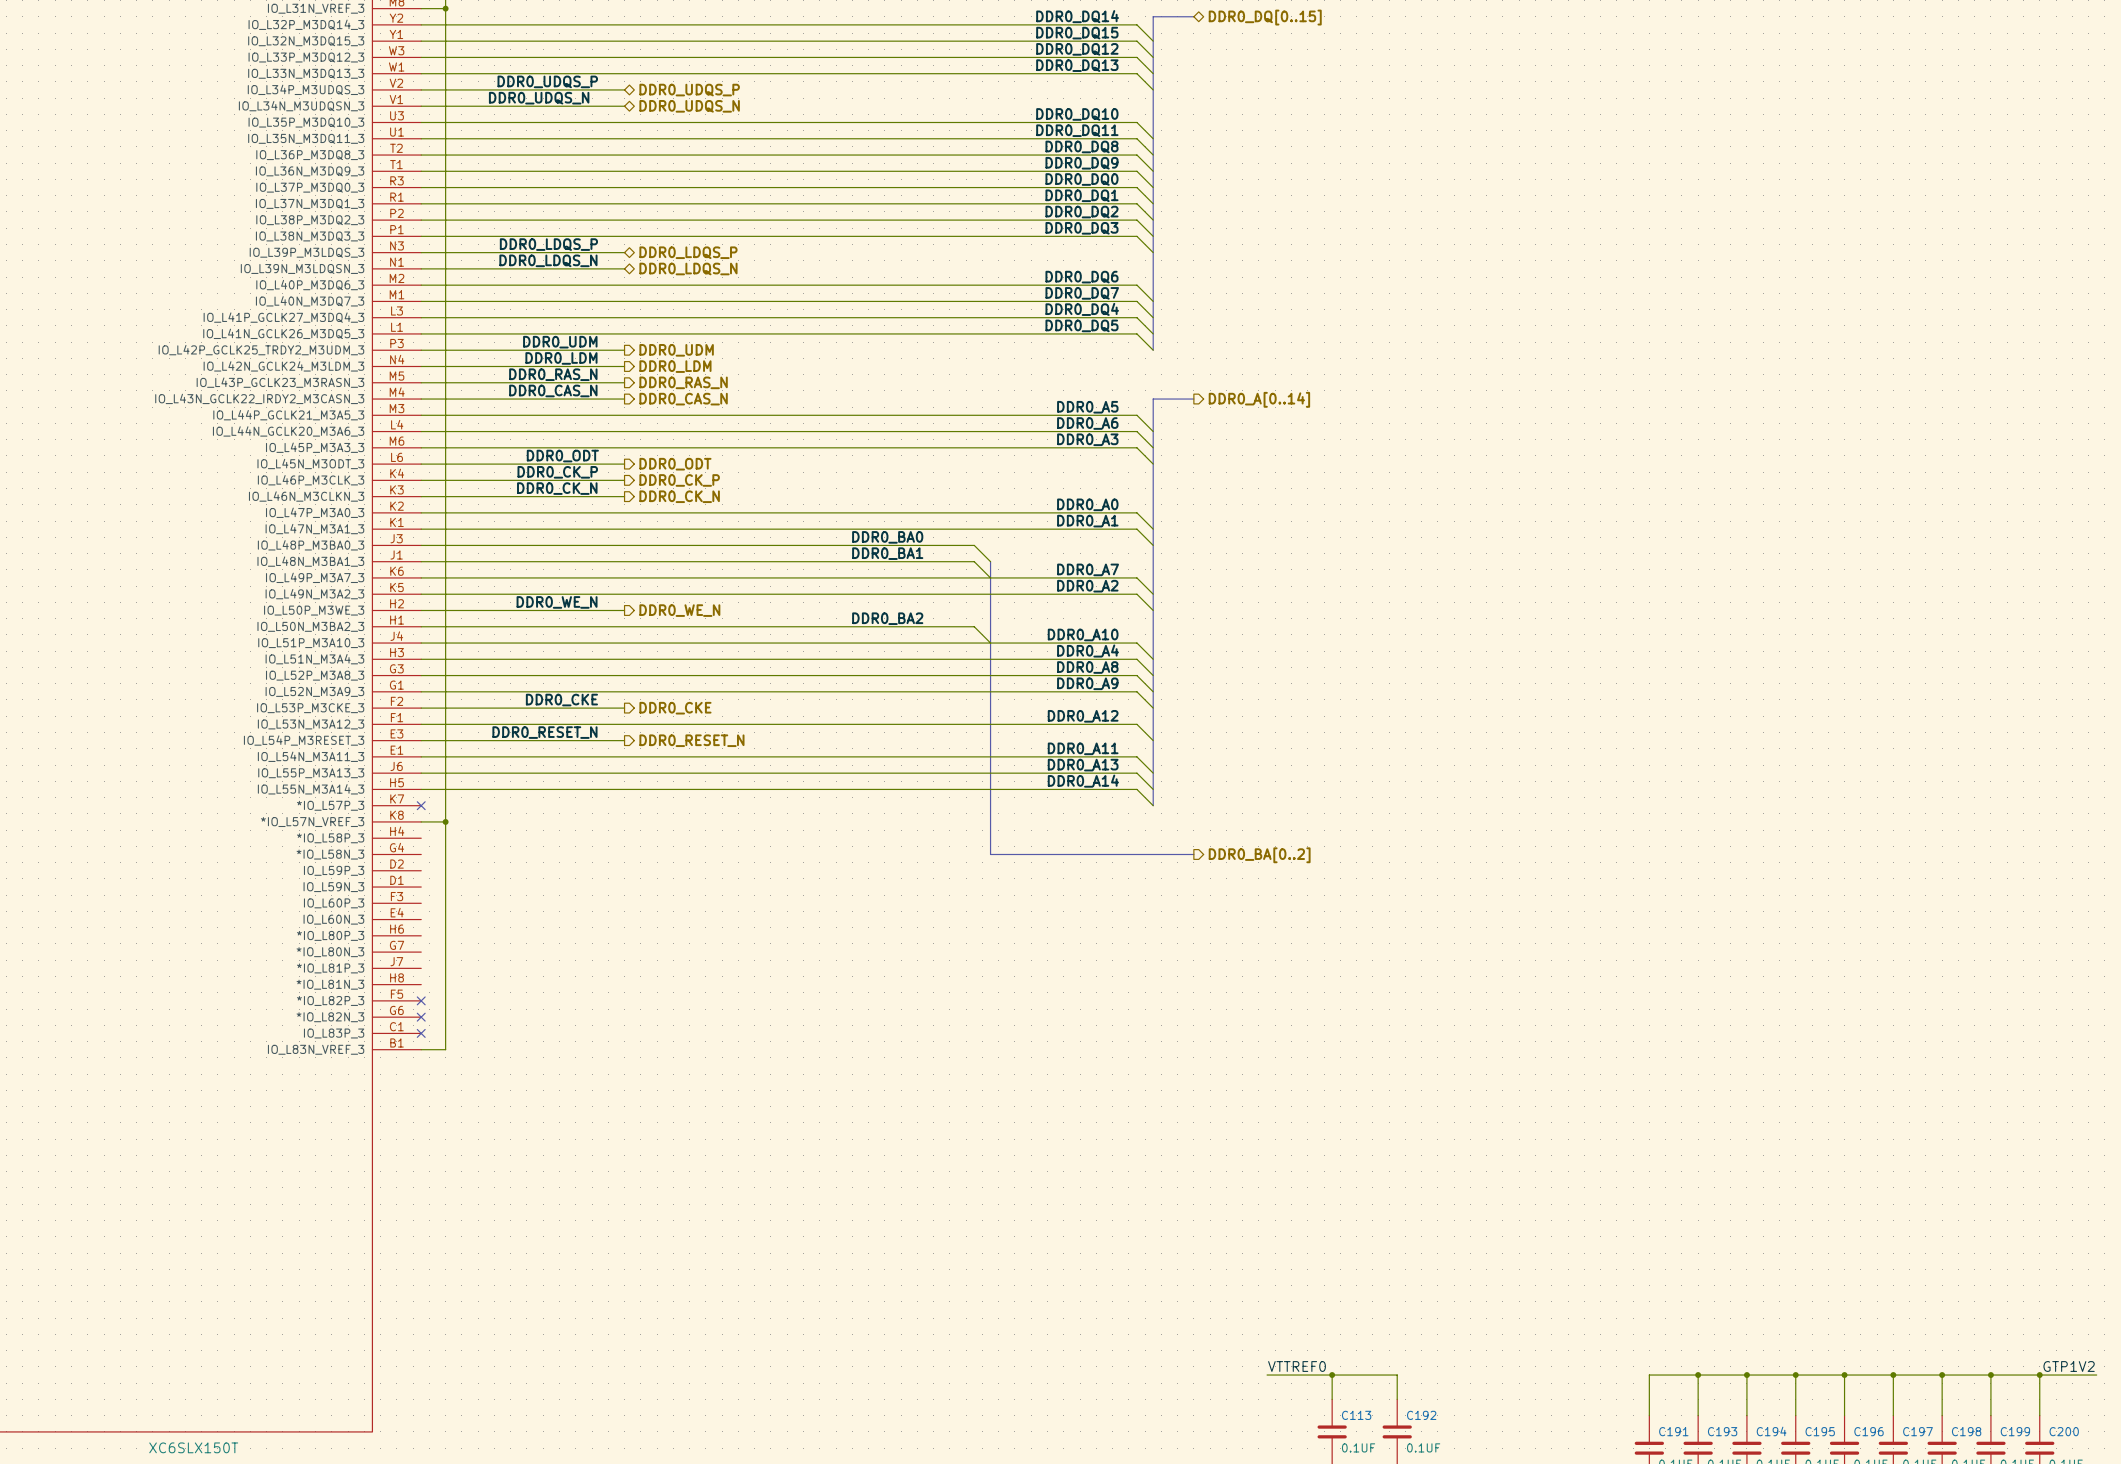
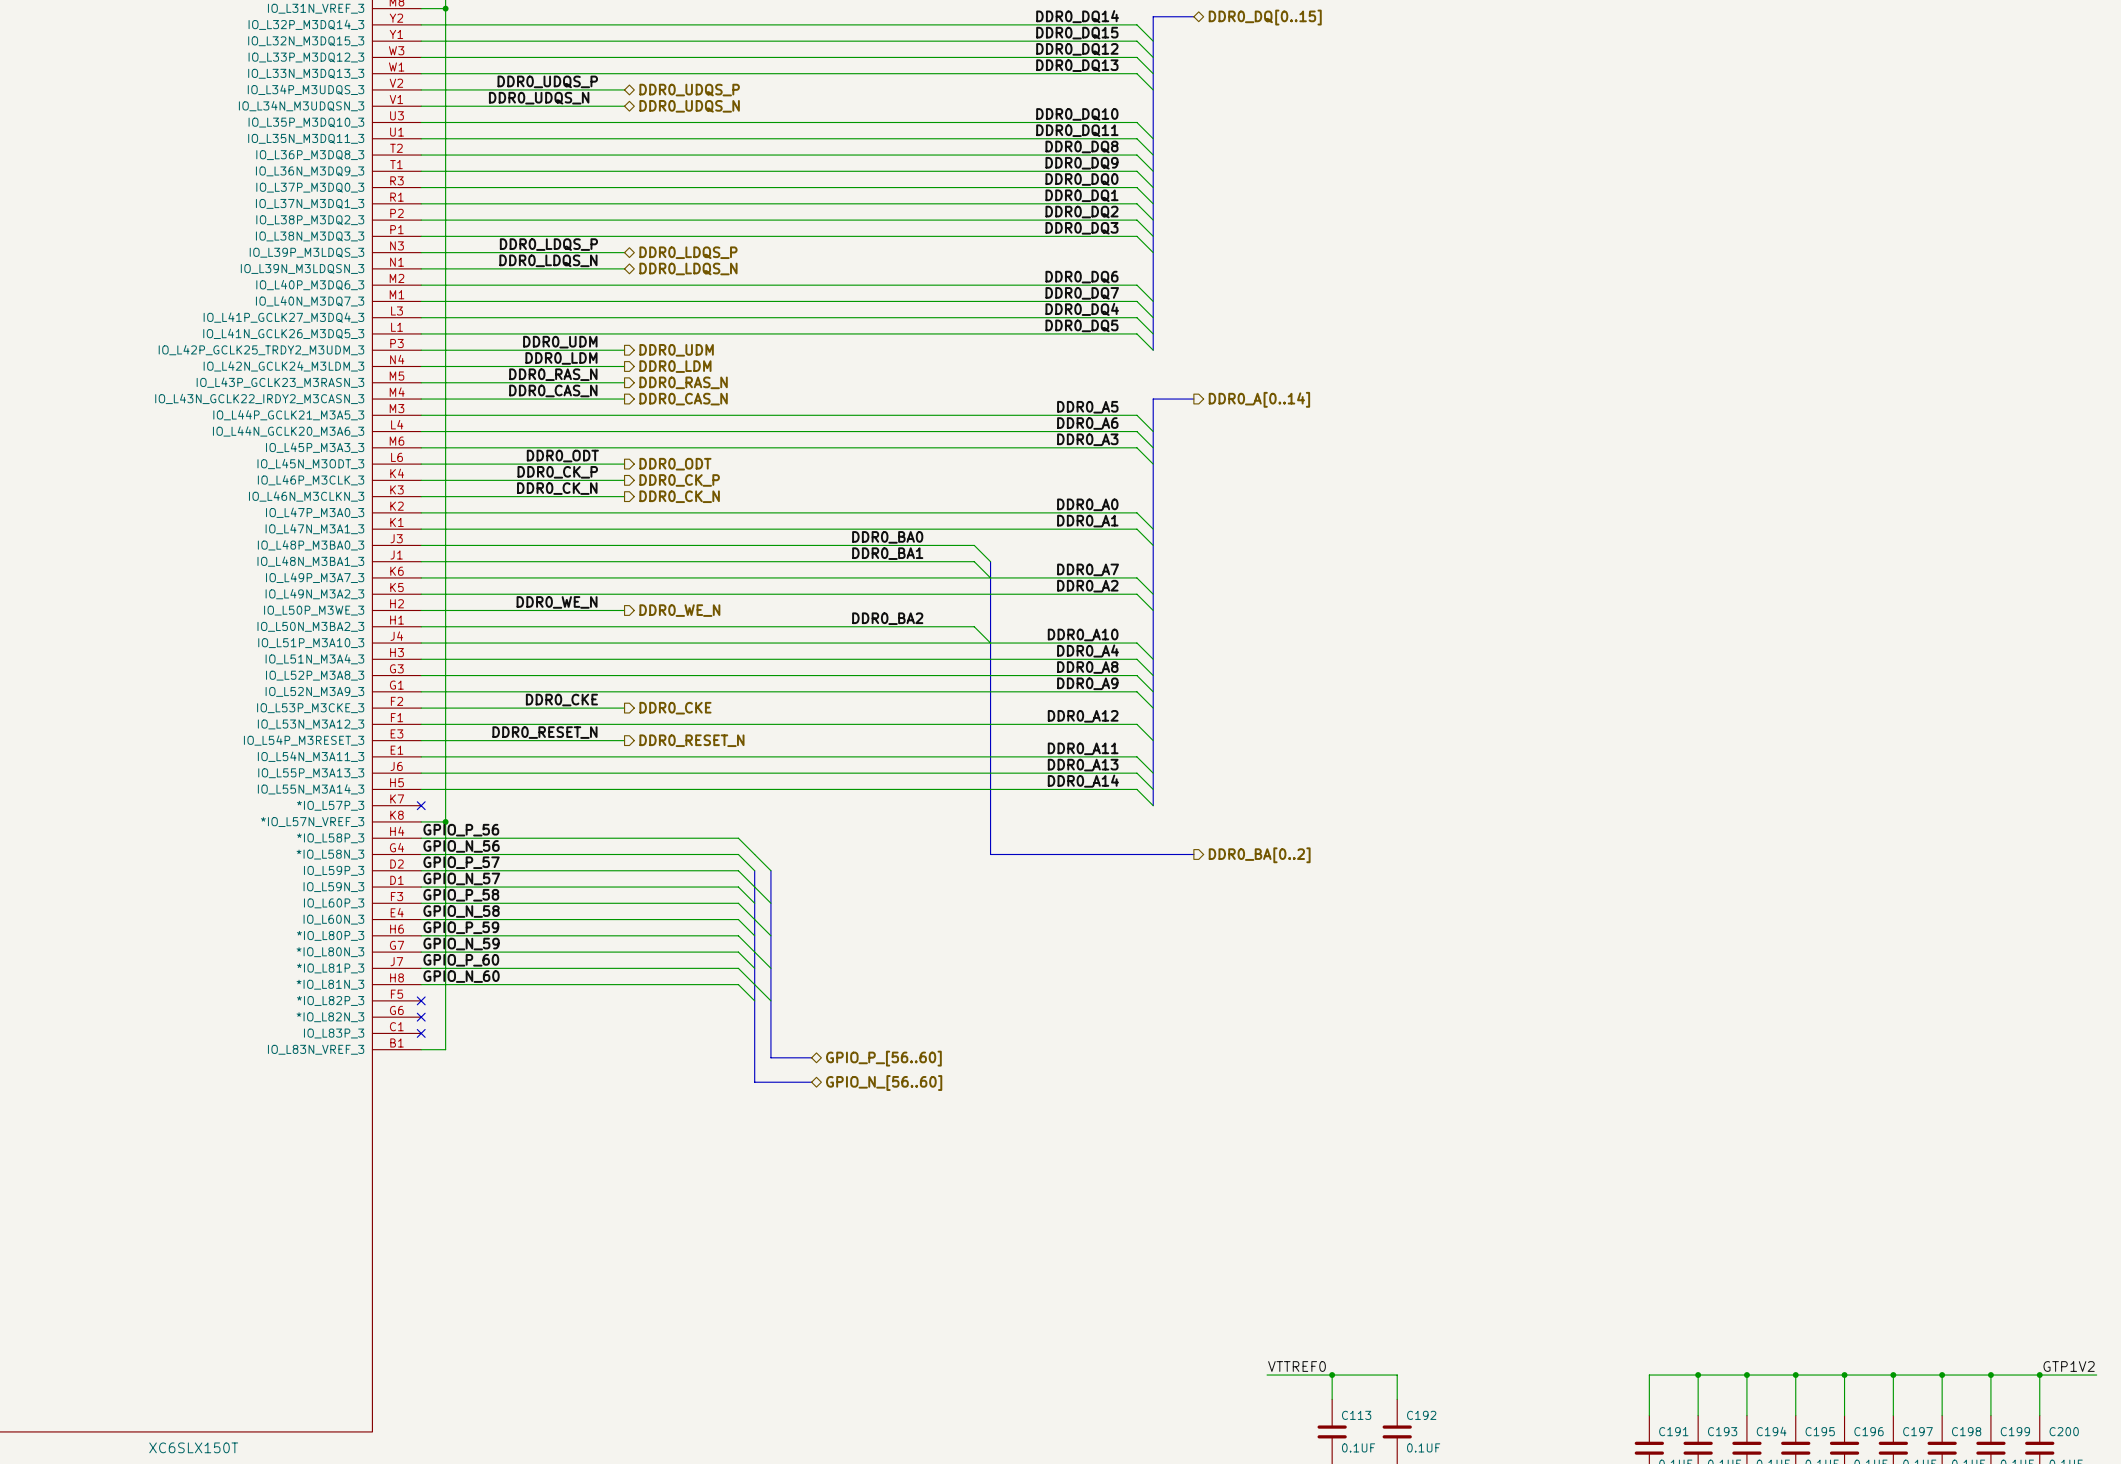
label: none -> GPIO_P_56 (461, 830)
wire: none -> (421, 838) (738, 838) (770, 870)
label: none -> GPIO_N_56 (461, 846)
wire: none -> (421, 854) (738, 854) (754, 870)
label: none -> GPIO_P_57 (461, 862)
wire: none -> (421, 870) (738, 870) (770, 903)
bus: none -> (754, 870) (754, 1082) (811, 1082)
bus: none -> (770, 870) (770, 1057) (811, 1057)
label: none -> GPIO_N_57 (461, 878)
wire: none -> (421, 887) (738, 887) (754, 903)
label: none -> GPIO_P_58 (461, 895)
wire: none -> (421, 903) (738, 903) (770, 935)
label: none -> GPIO_N_58 (461, 911)
wire: none -> (421, 919) (738, 919) (754, 935)
label: none -> GPIO_P_59 (461, 927)
wire: none -> (421, 935) (738, 935) (770, 968)
label: none -> GPIO_N_59 (461, 944)
wire: none -> (421, 952) (738, 952) (754, 968)
label: none -> GPIO_P_60 (461, 960)
wire: none -> (421, 968) (738, 968) (770, 1000)
label: none -> GPIO_N_60 (461, 976)
wire: none -> (421, 984) (738, 984) (754, 1000)
hierarchical label: none -> GPIO_P_[56..60] (883, 1058)
hierarchical label: none -> GPIO_N_[56..60] (884, 1083)

